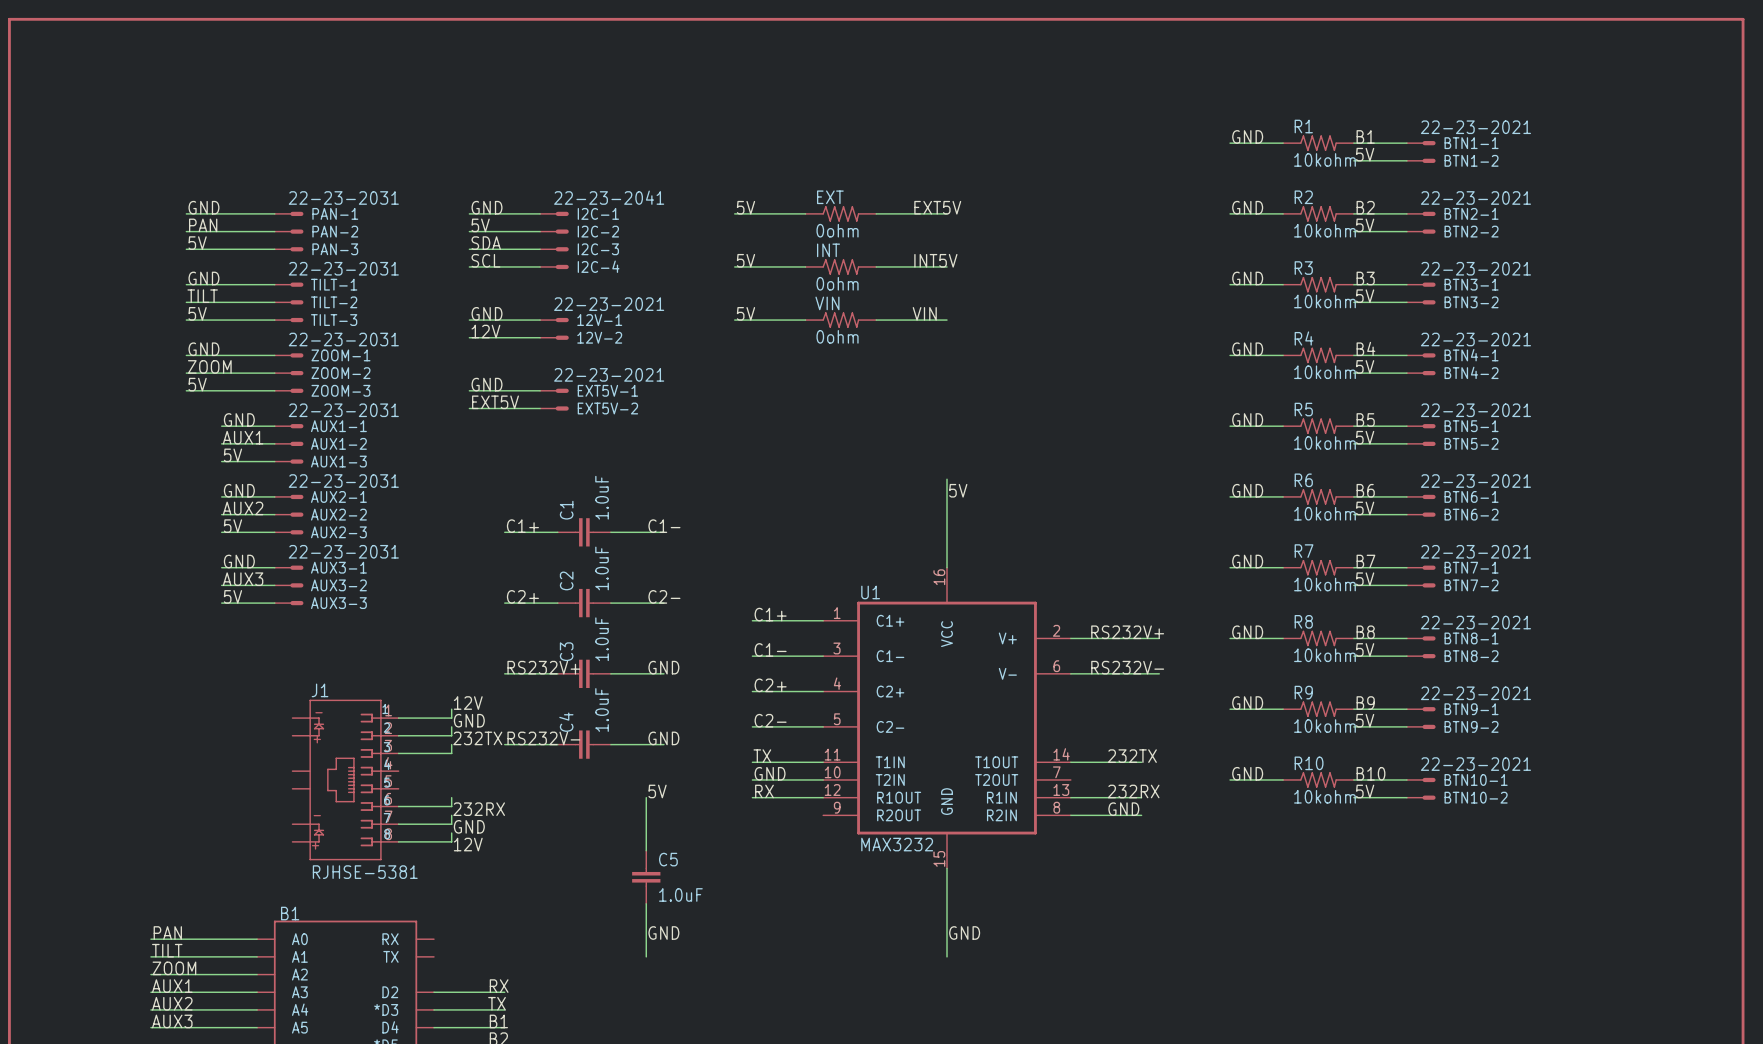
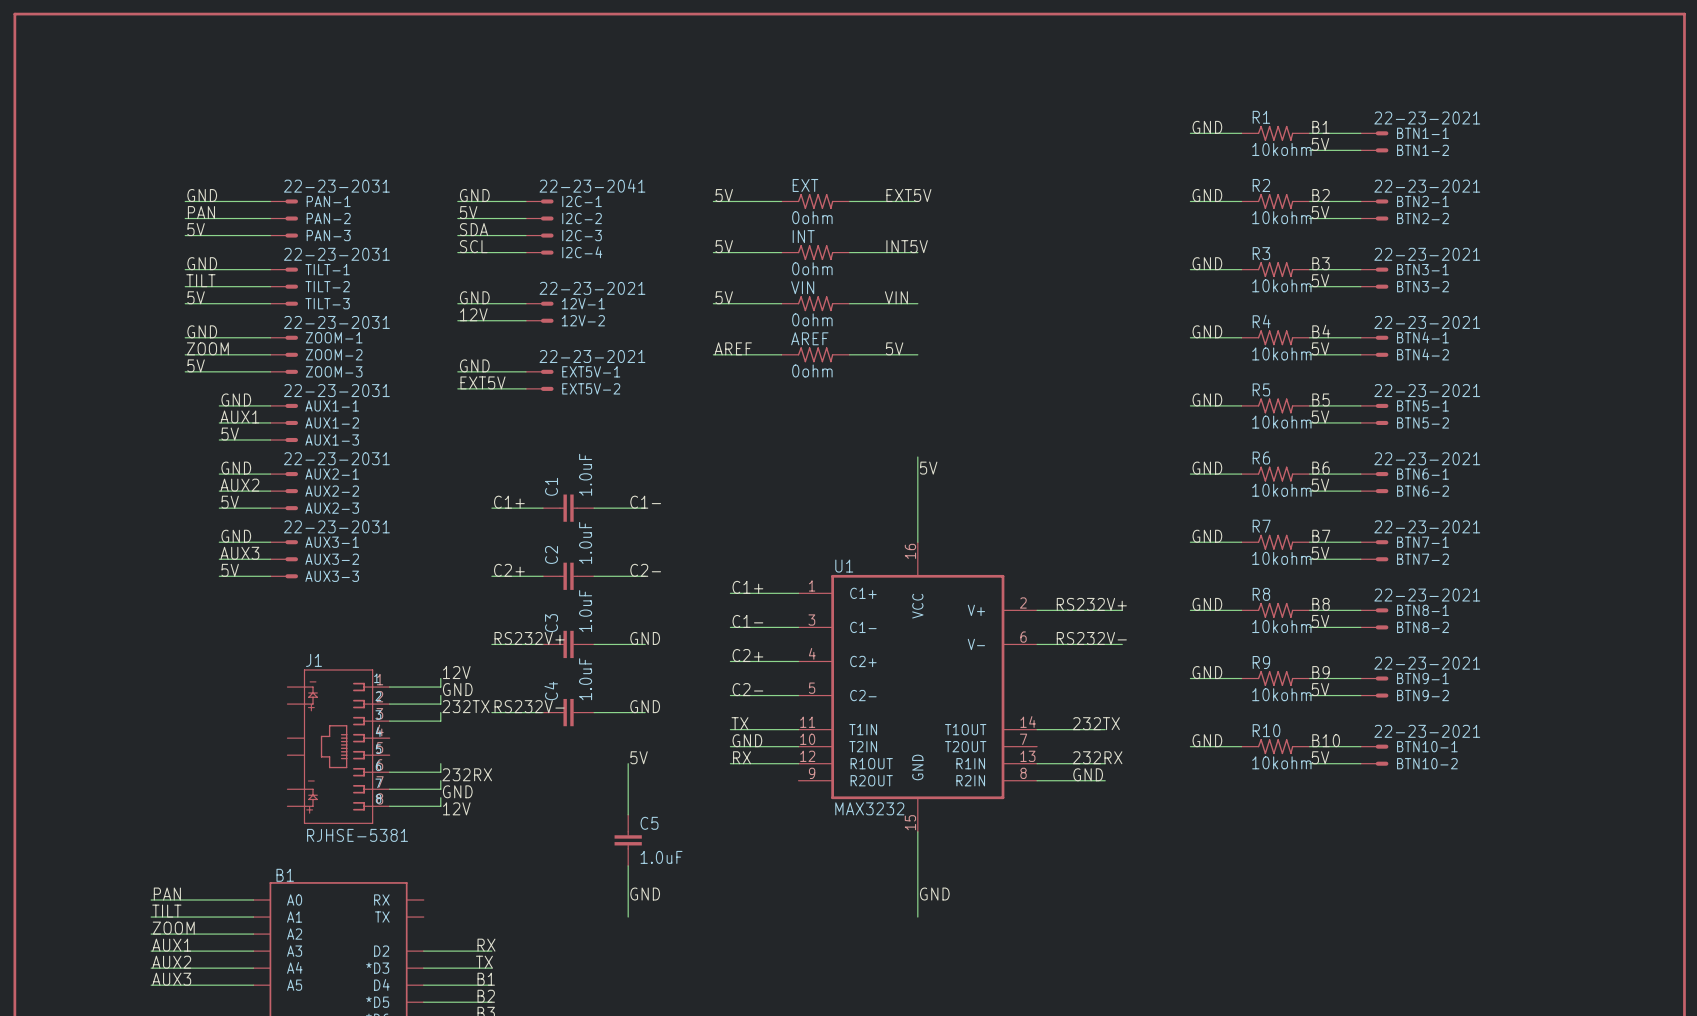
label: none -> AREF (733, 348)
label: none -> 5V (894, 348)
wire: none -> (713, 354) (781, 354)
AREF: none -> 0ohm (815, 354)
wire: none -> (849, 354) (917, 354)

